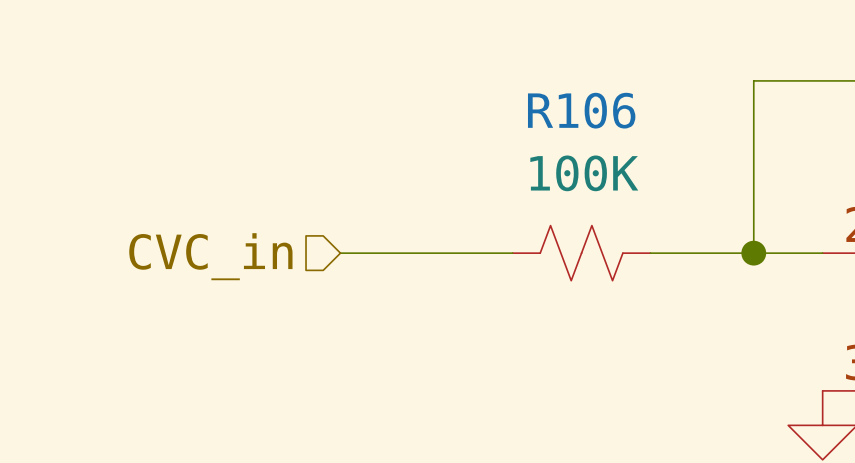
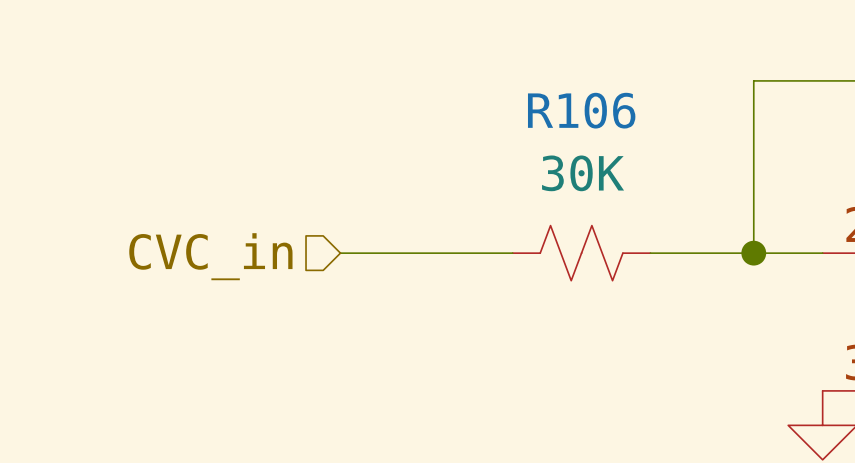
R106 value: 100K (584, 173) -> 30K (583, 173)

